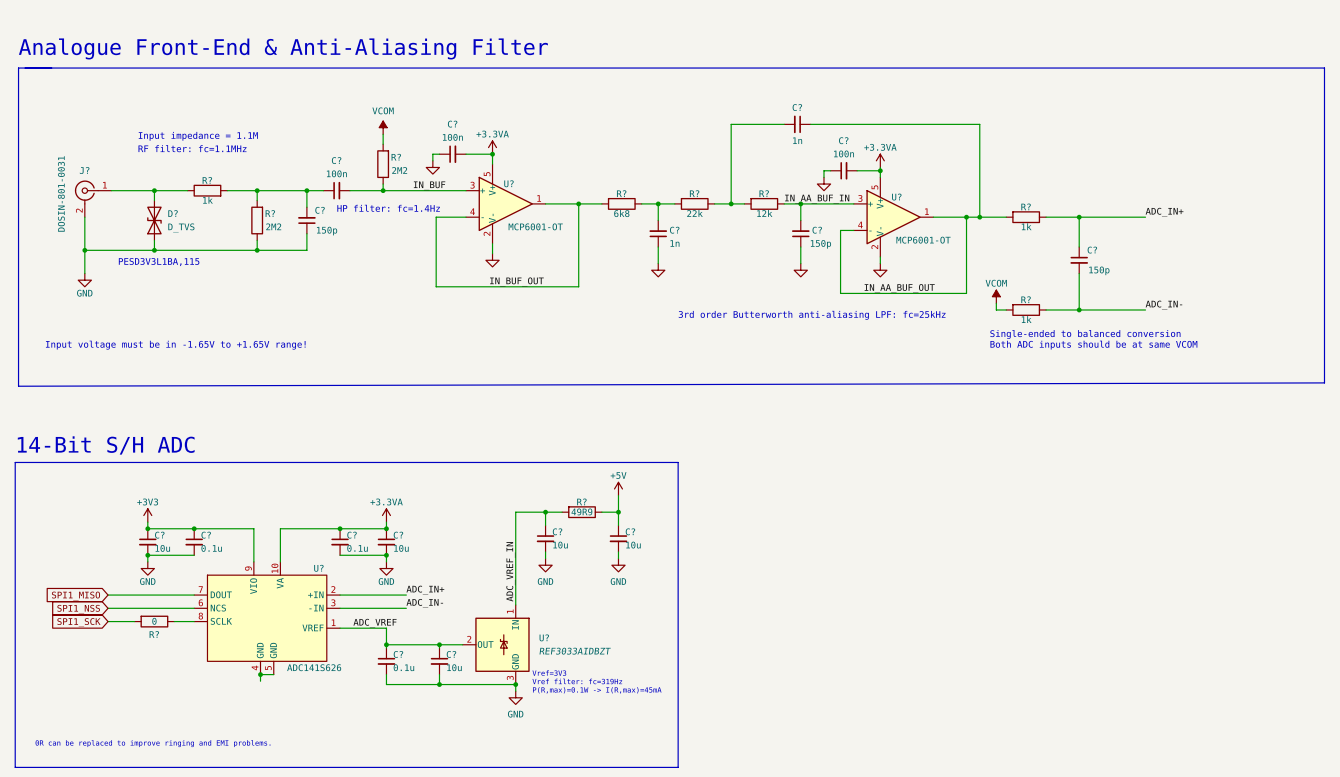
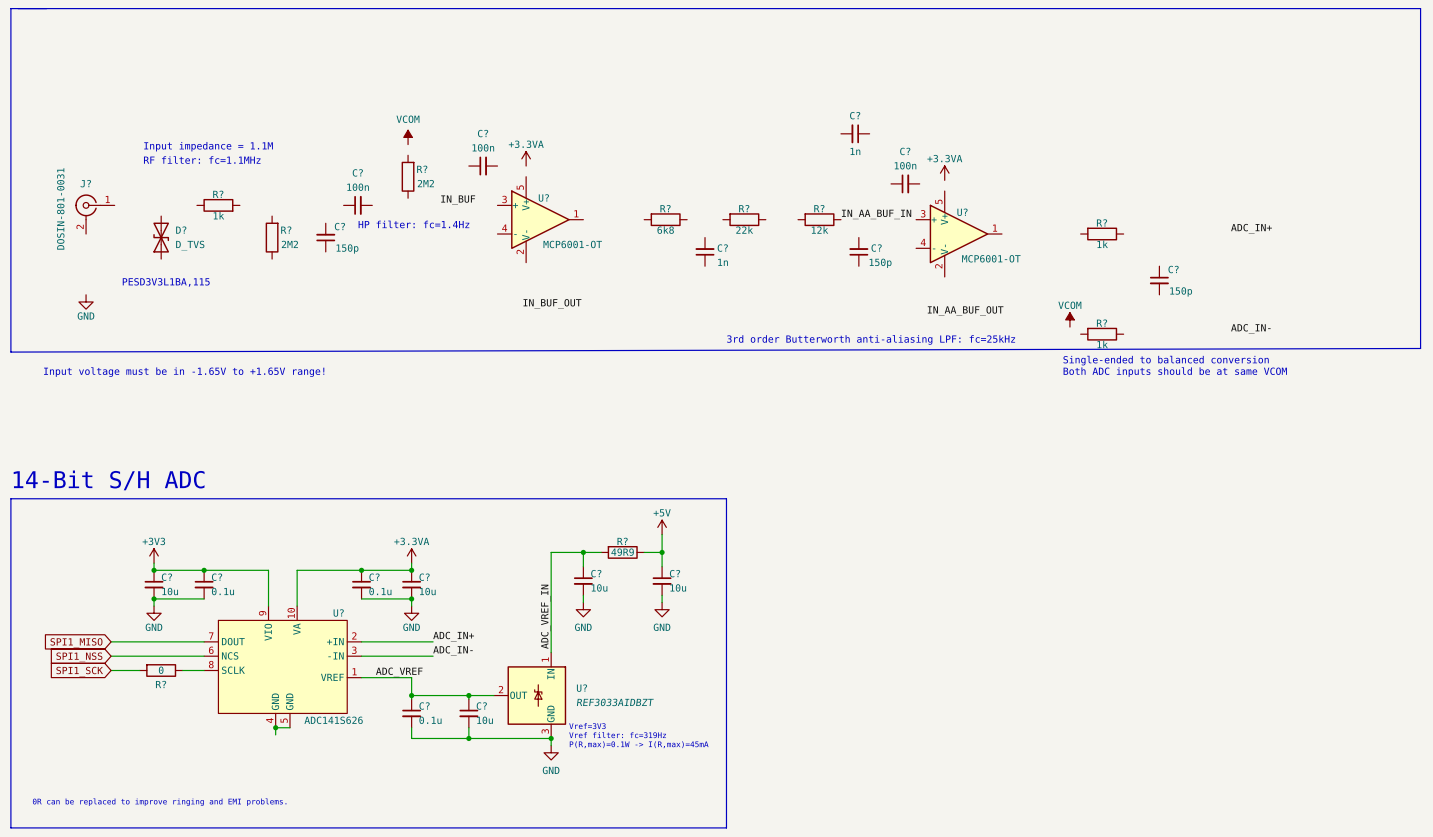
text: Analogue Front-End & Anti-Aliasing Filter (283, 48) -> none
line: (18, 68) (1324, 68) (1324, 382) (18, 386) (18, 68) -> (10, 8) (1420, 8) (1420, 348) (10, 352) (10, 8)
wire: (784, 124) (731, 124) (731, 203) -> none
wire: (810, 124) (979, 124) (979, 217) -> none
wire: (383, 134) (383, 144) -> none
wire: (439, 154) (432, 154) (432, 160) -> none
wire: (466, 154) (492, 154) (492, 164) -> none
junction: (492, 154) -> none
power symbol: (432, 167) -> none
wire: (880, 167) (880, 177) -> none
wire: (830, 170) (823, 170) (823, 177) -> none
wire: (857, 170) (880, 170) -> none
junction: (880, 170) -> none
wire: (383, 184) (383, 190) -> none
power symbol: (823, 184) -> none
wire: (111, 190) (187, 190) -> none
wire: (154, 190) (154, 200) -> none
junction: (154, 190) -> none
wire: (227, 190) (323, 190) -> none
wire: (257, 190) (257, 200) -> none
junction: (257, 190) -> none
wire: (306, 190) (306, 207) -> none
junction: (306, 190) -> none
wire: (349, 190) (466, 190) -> none
junction: (383, 190) -> none
wire: (545, 203) (601, 203) -> none
wire: (578, 203) (578, 286) (436, 286) (436, 217) (466, 217) -> none
junction: (578, 203) -> none
wire: (641, 203) (674, 203) -> none
wire: (658, 203) (658, 220) -> none
junction: (658, 203) -> none
wire: (714, 203) (744, 203) -> none
junction: (731, 203) -> none
wire: (784, 203) (853, 203) -> none
wire: (800, 203) (800, 220) -> none
junction: (800, 203) -> none
wire: (84, 217) (84, 273) -> none
wire: (933, 217) (1006, 217) -> none
wire: (966, 217) (966, 293) (840, 293) (840, 230) (853, 230) -> none
junction: (966, 217) -> none
junction: (979, 217) -> none
wire: (1046, 217) (1145, 217) -> none
wire: (1079, 217) (1079, 247) -> none
junction: (1079, 217) -> none
wire: (306, 233) (306, 250) (84, 250) -> none
wire: (154, 240) (154, 250) -> none
wire: (257, 240) (257, 250) -> none
wire: (492, 243) (492, 253) -> none
wire: (658, 247) (658, 263) -> none
wire: (800, 247) (800, 263) -> none
junction: (84, 250) -> none
junction: (154, 250) -> none
junction: (257, 250) -> none
wire: (880, 256) (880, 263) -> none
power symbol: (492, 260) -> none
power symbol: (658, 270) -> none
power symbol: (800, 270) -> none
power symbol: (880, 270) -> none
wire: (1079, 273) (1079, 309) -> none
wire: (996, 303) (996, 309) (1006, 309) -> none
wire: (1046, 309) (1145, 309) -> none
junction: (1079, 309) -> none

